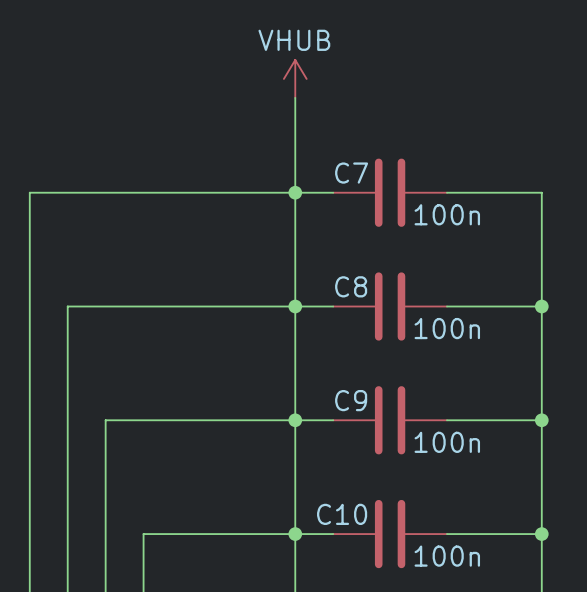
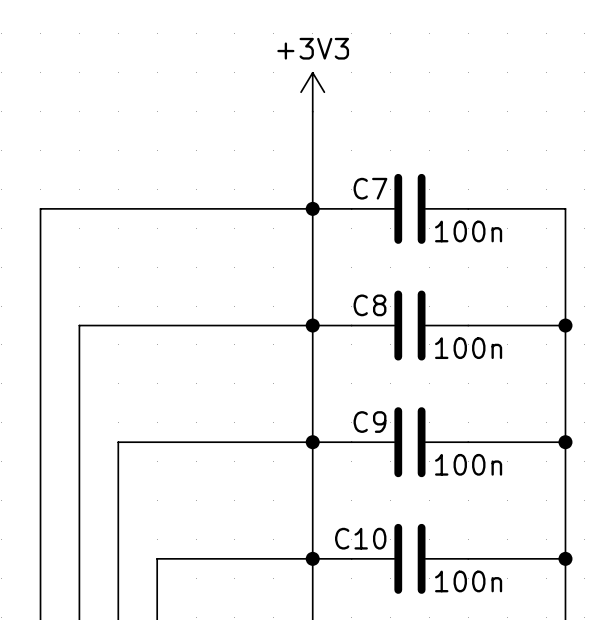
power symbol: VHUB (295, 78) -> +3V3 (312, 92)

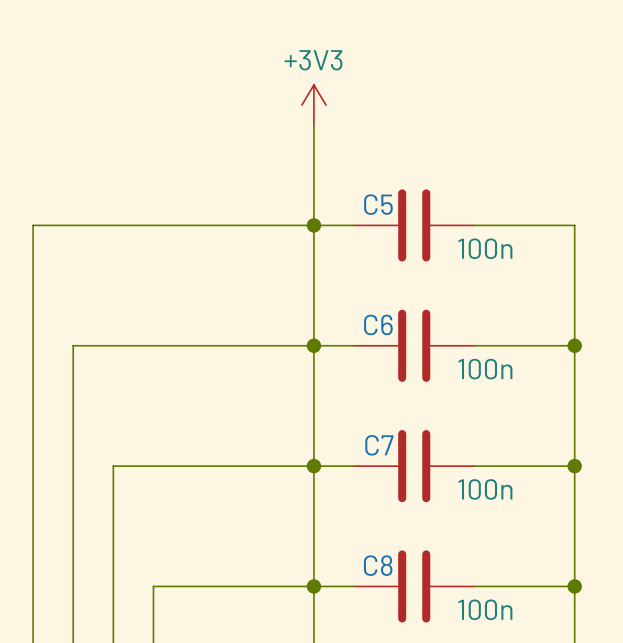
C7 name: C7 (370, 188) -> C5 (378, 204)
C8 name: C8 (369, 305) -> C6 (378, 324)
C9 name: C9 (369, 422) -> C7 (379, 445)
C10 name: C10 (360, 538) -> C8 (378, 565)

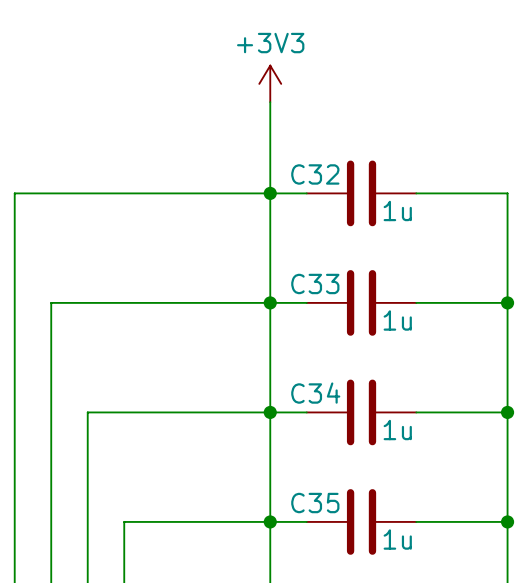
C5 name: C5 (378, 204) -> C32 (315, 174)
C5 value: 100n (485, 248) -> 1u (397, 210)
C6 name: C6 (378, 324) -> C33 (315, 283)
C6 value: 100n (485, 369) -> 1u (397, 320)
C7 name: C7 (379, 445) -> C34 (315, 393)
C7 value: 100n (485, 489) -> 1u (397, 430)
C8 name: C8 (378, 565) -> C35 (315, 503)
C8 value: 100n (485, 609) -> 1u (397, 539)

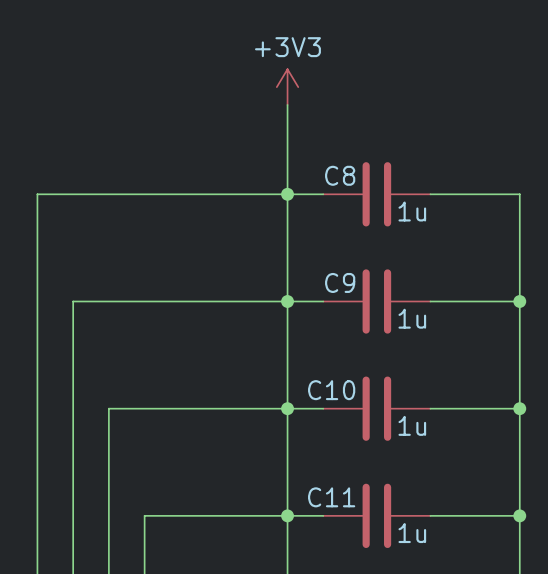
C32 name: C32 (315, 174) -> C8 (340, 175)
C33 name: C33 (315, 283) -> C9 (340, 282)
C34 name: C34 (315, 393) -> C10 (331, 390)
C35 name: C35 (315, 503) -> C11 (331, 497)

